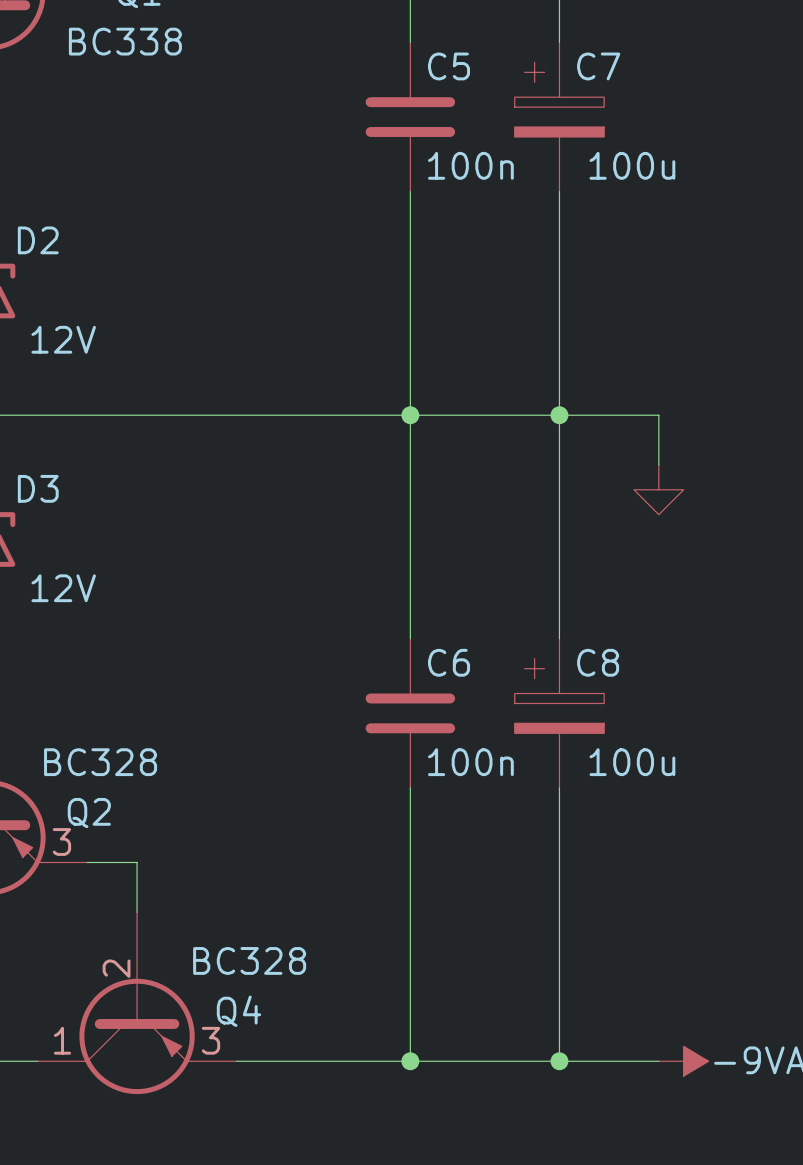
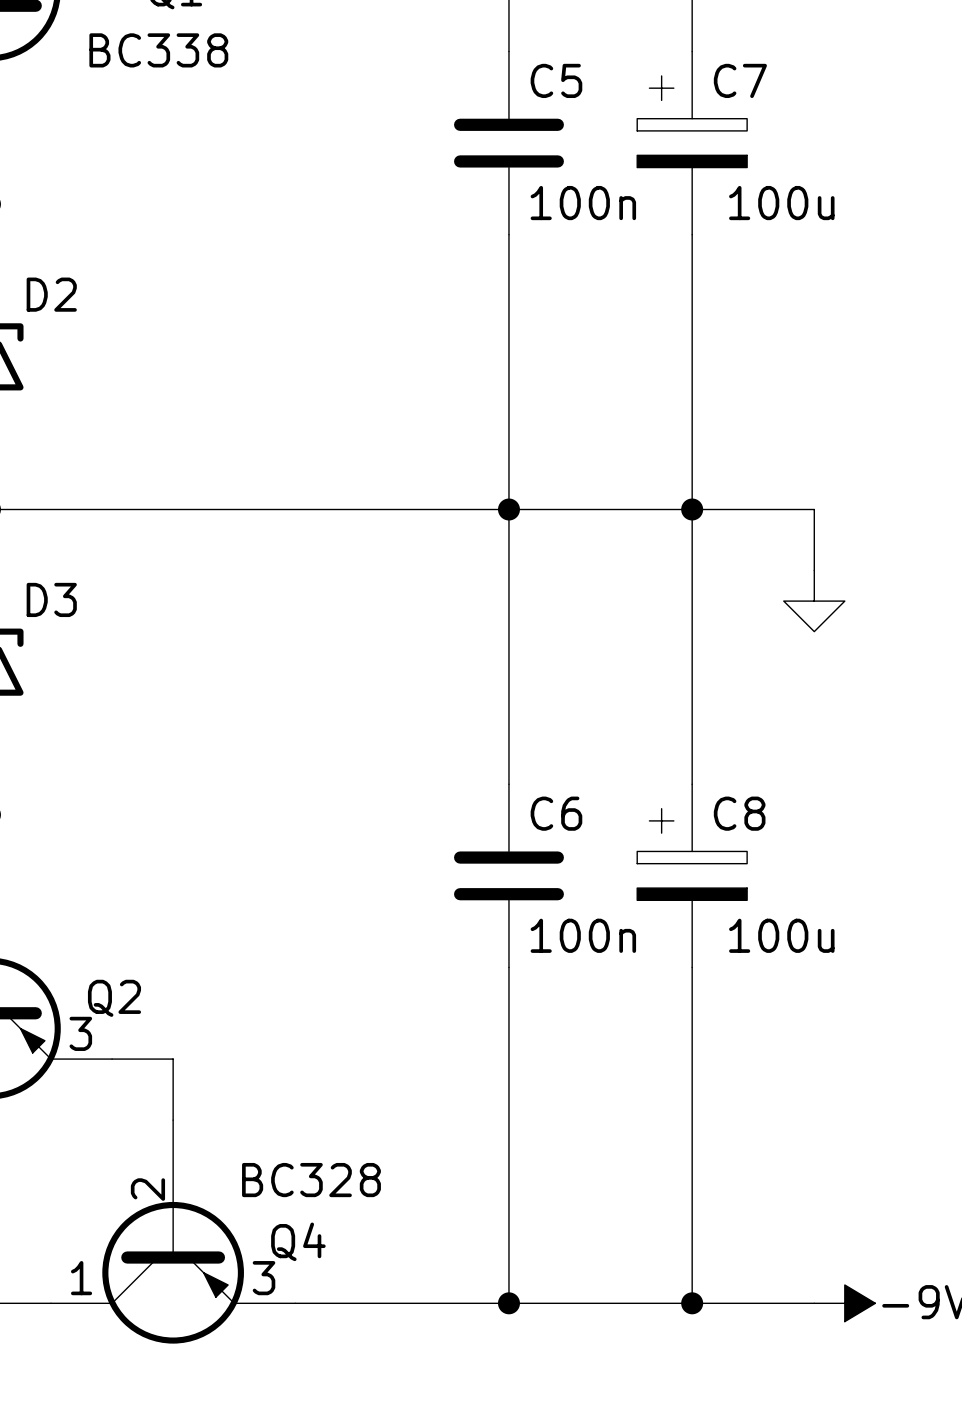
D2 value: 12V (63, 339) -> none
D3 value: 12V (63, 588) -> none
Q2 value: BC328 (100, 762) -> none

